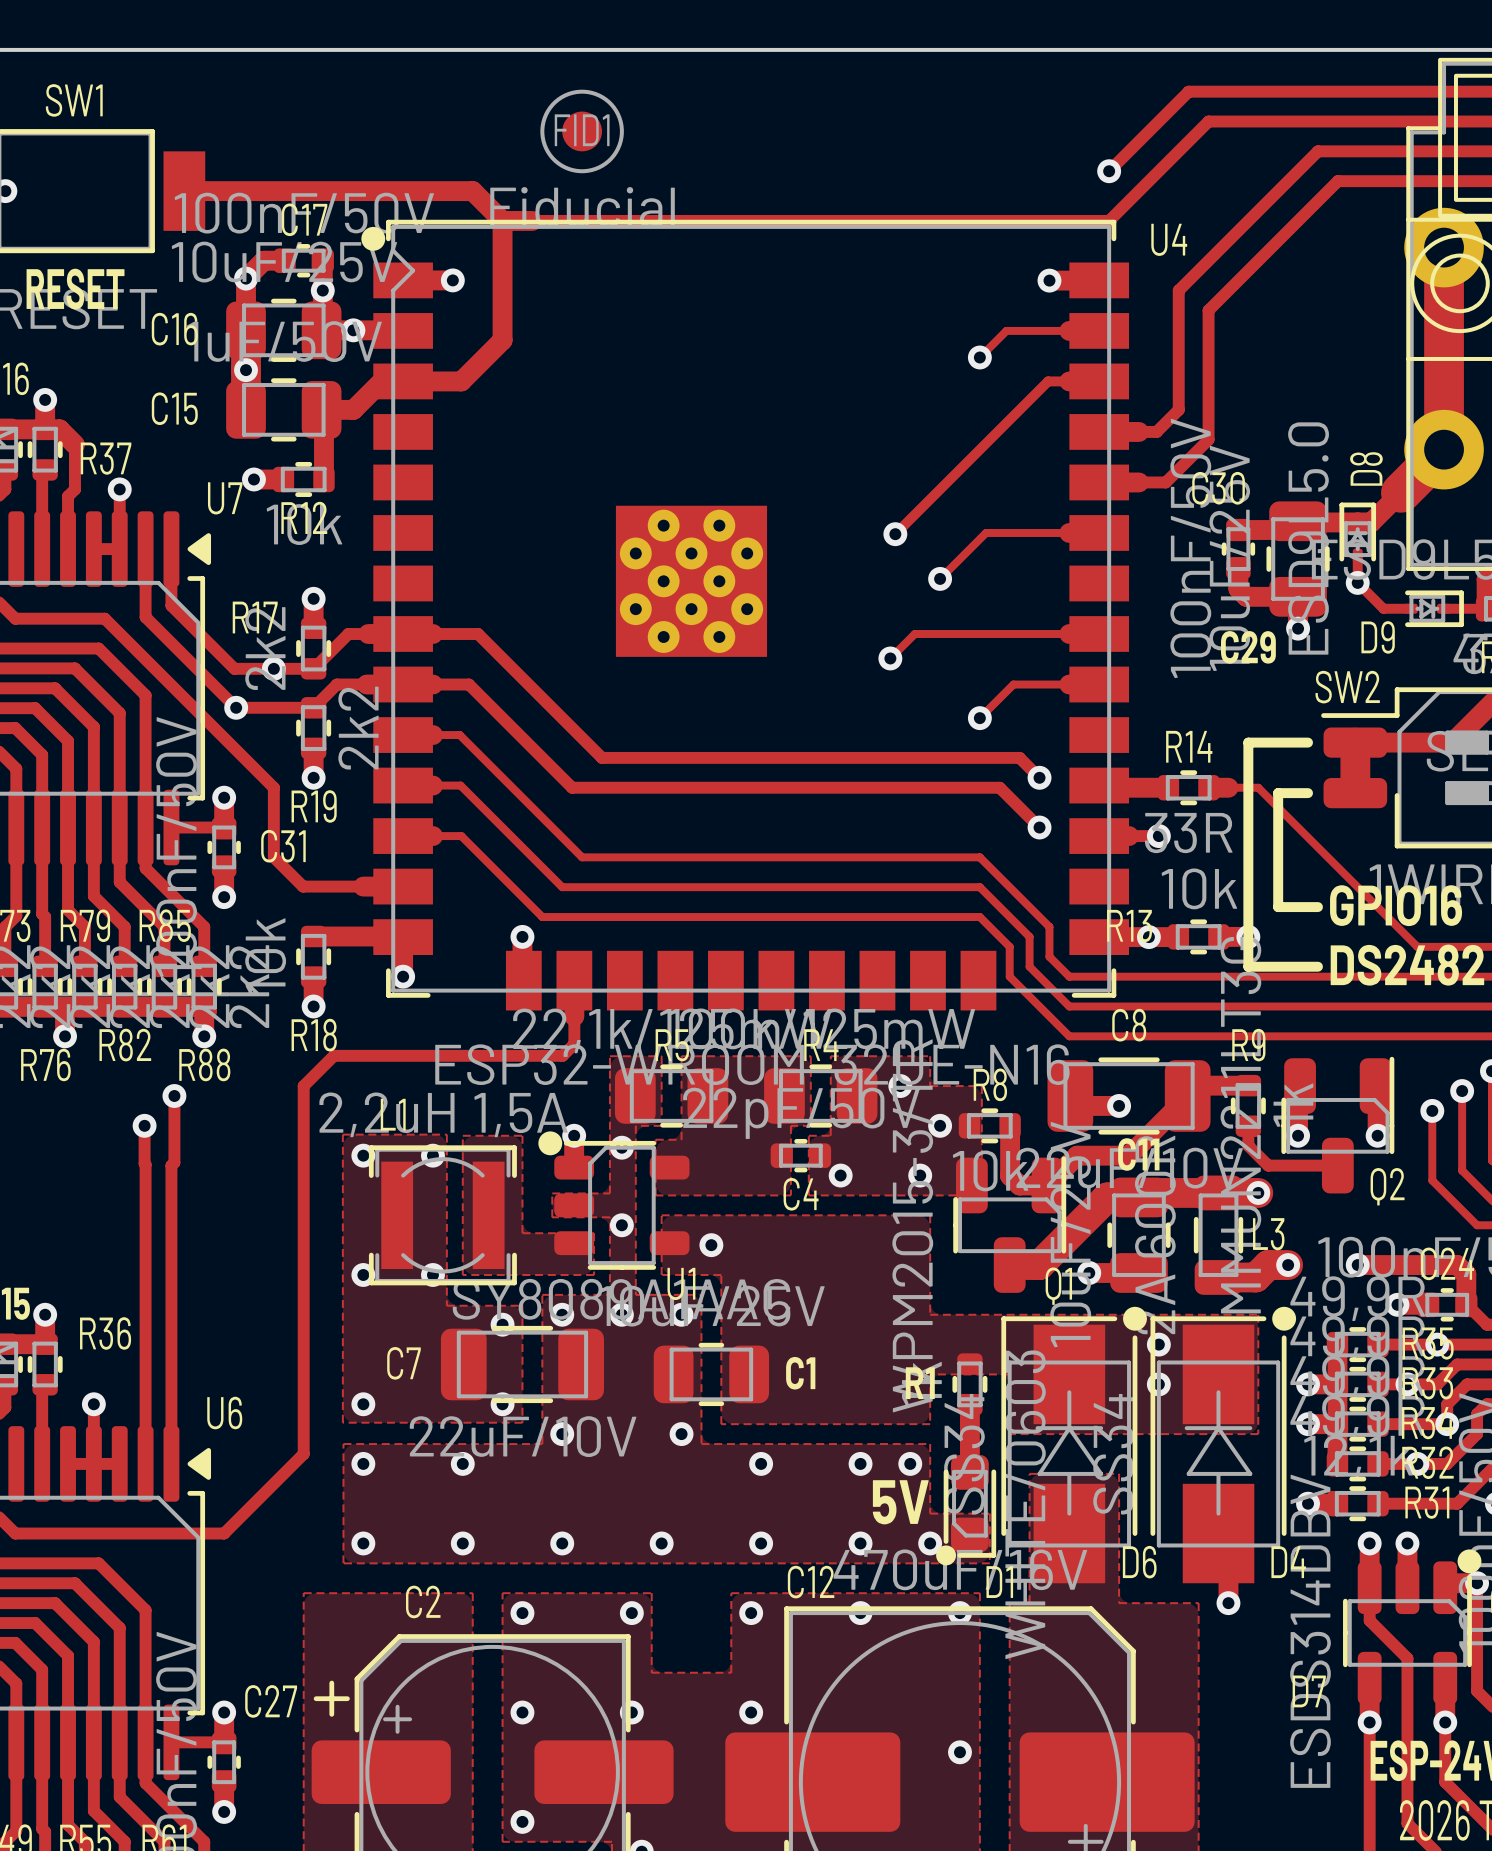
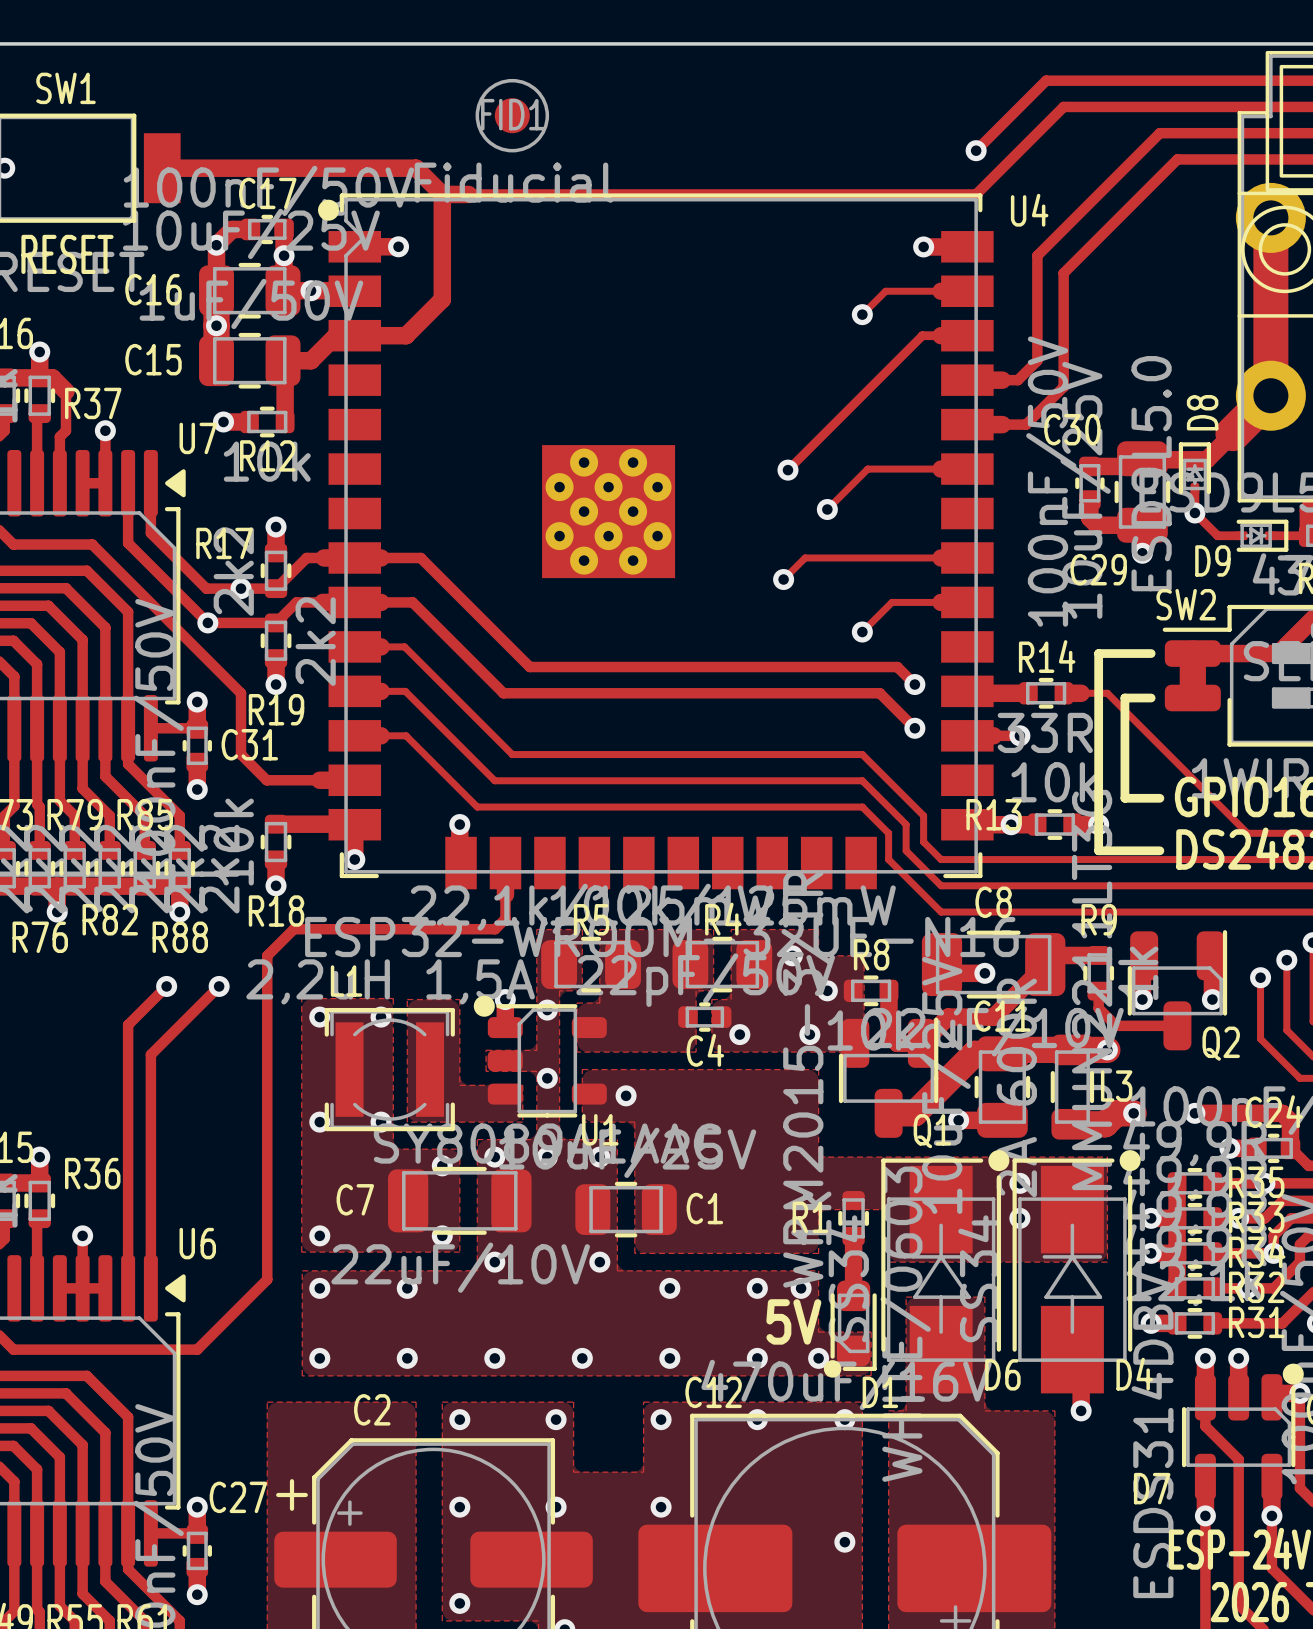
track: (174, 1096) (174, 1162) (171, 1165) (171, 1198) -> (219, 986) (150, 1054)
via: (174, 1096) -> none
via: none -> (166, 986)
via: none -> (219, 986)
track: (144, 1125) (145, 1164) -> (166, 986) (128, 1024)
via: (144, 1125) -> none

